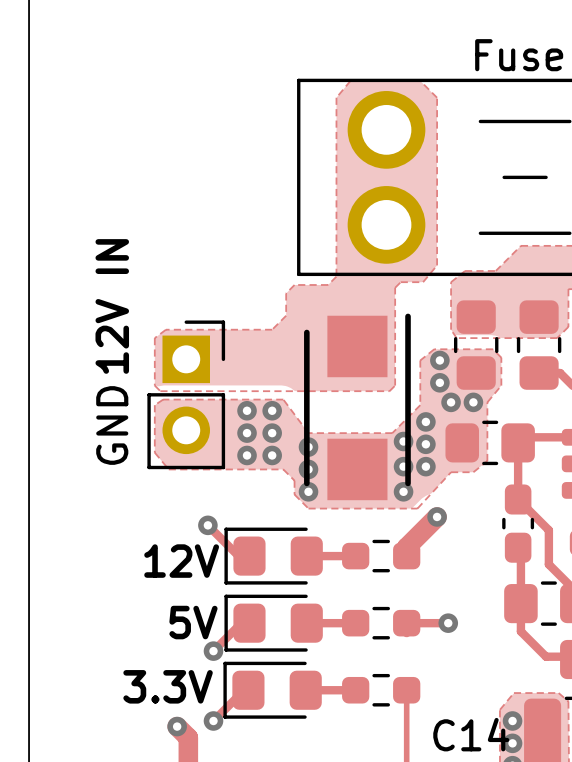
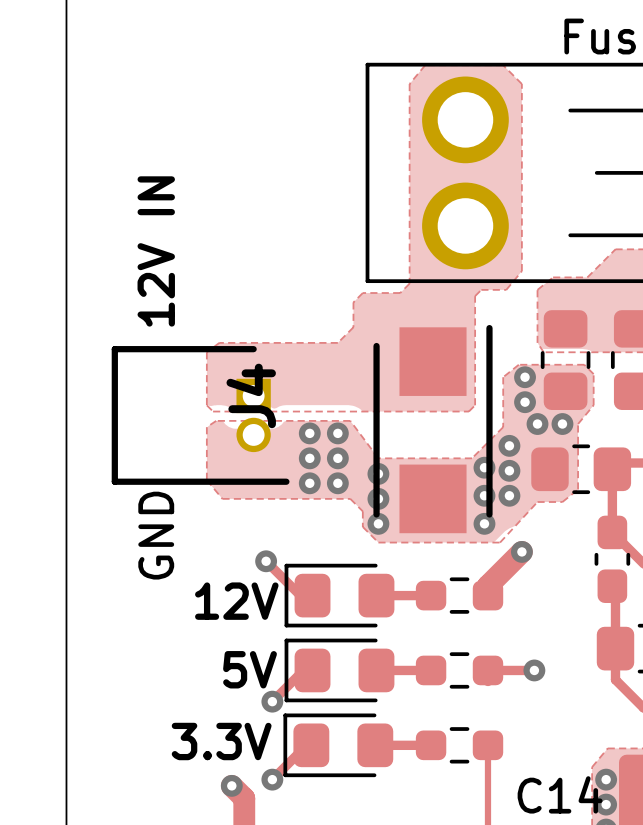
text position: 12V IN (112, 306) -> 12V IN (156, 251)
J4: none -> (200, 415)
part: (186, 394) -> none
text position: GND (112, 425) -> GND (156, 535)

